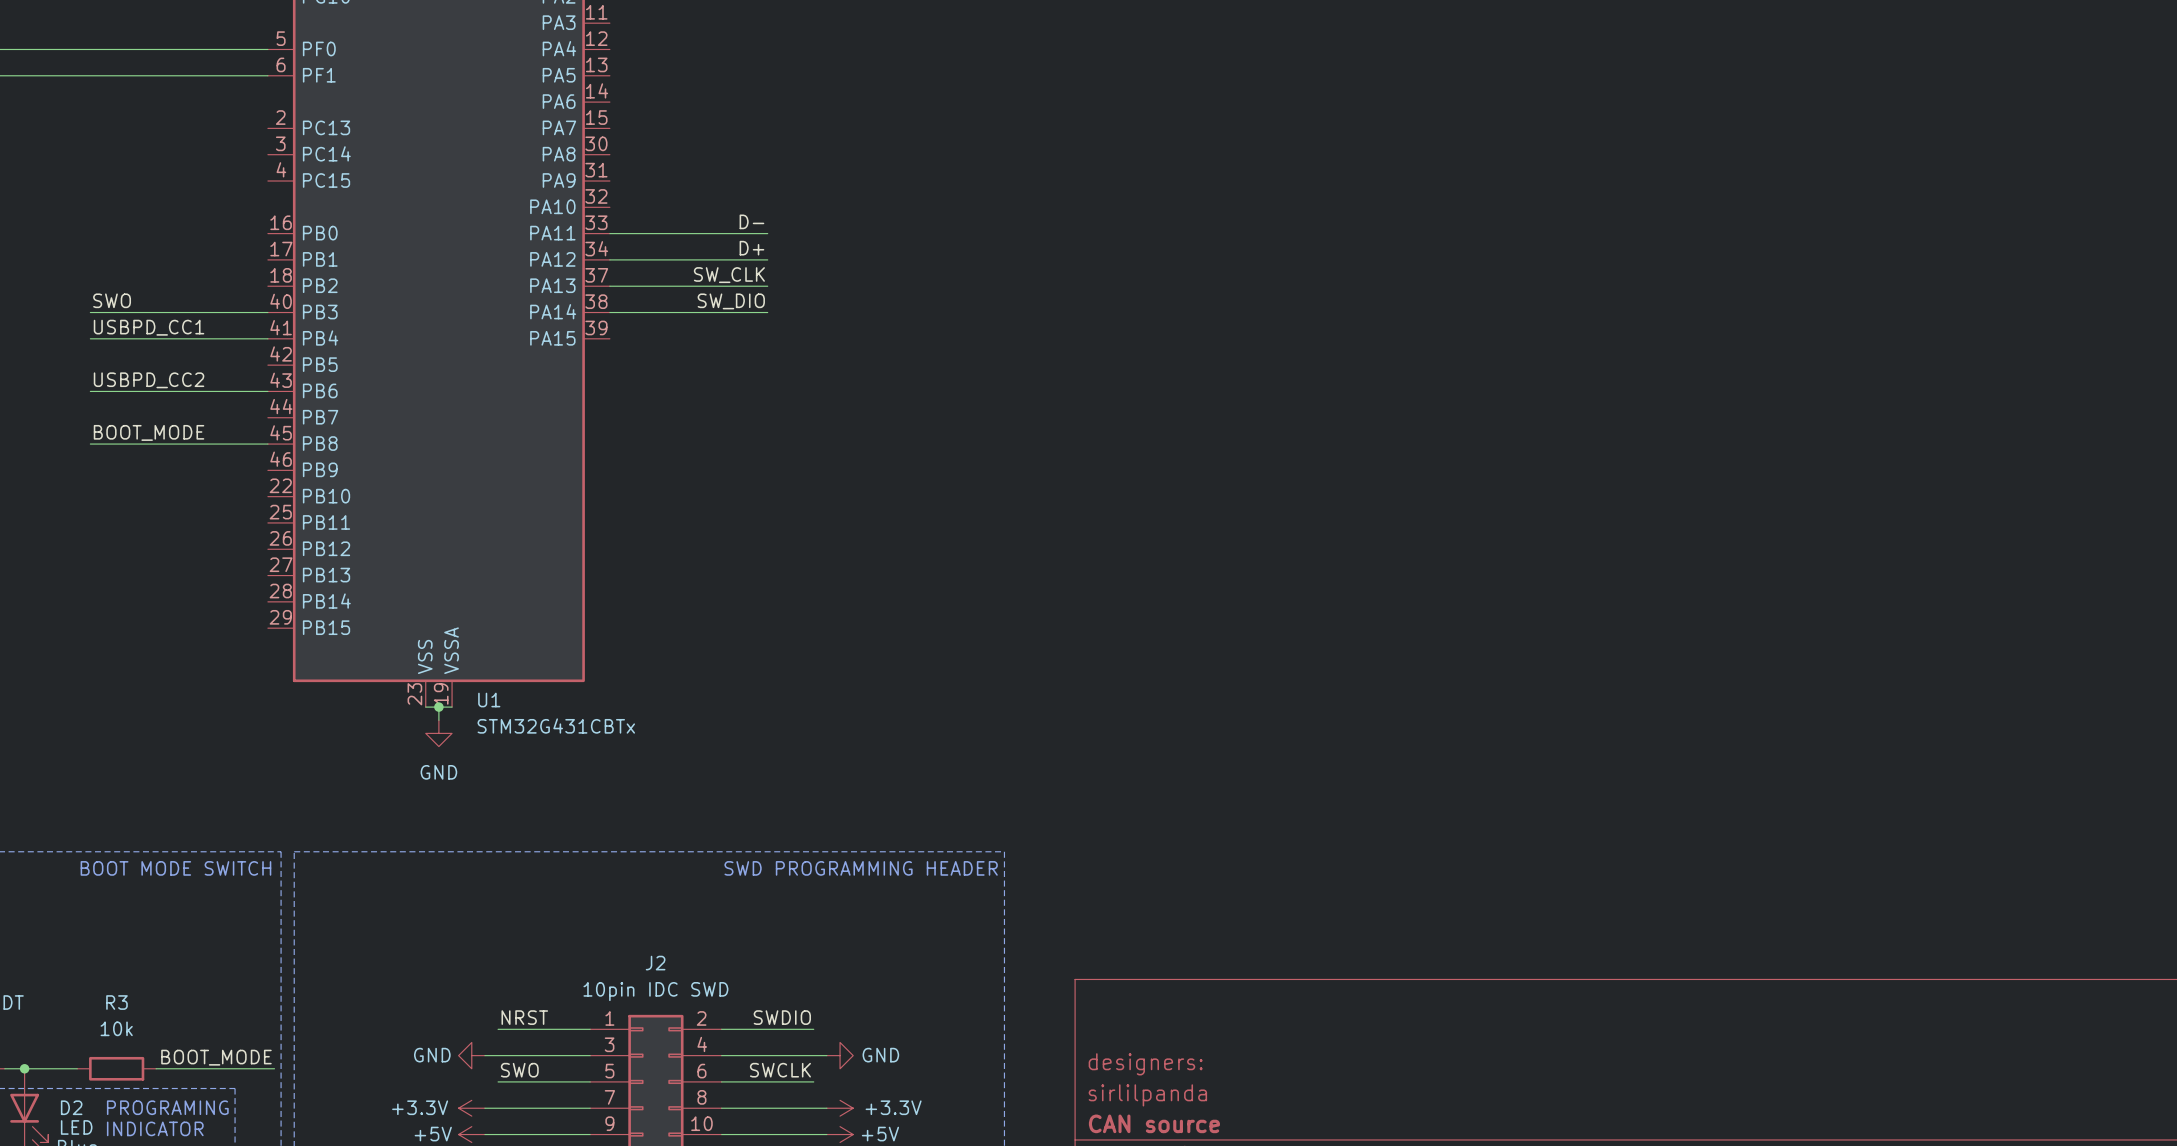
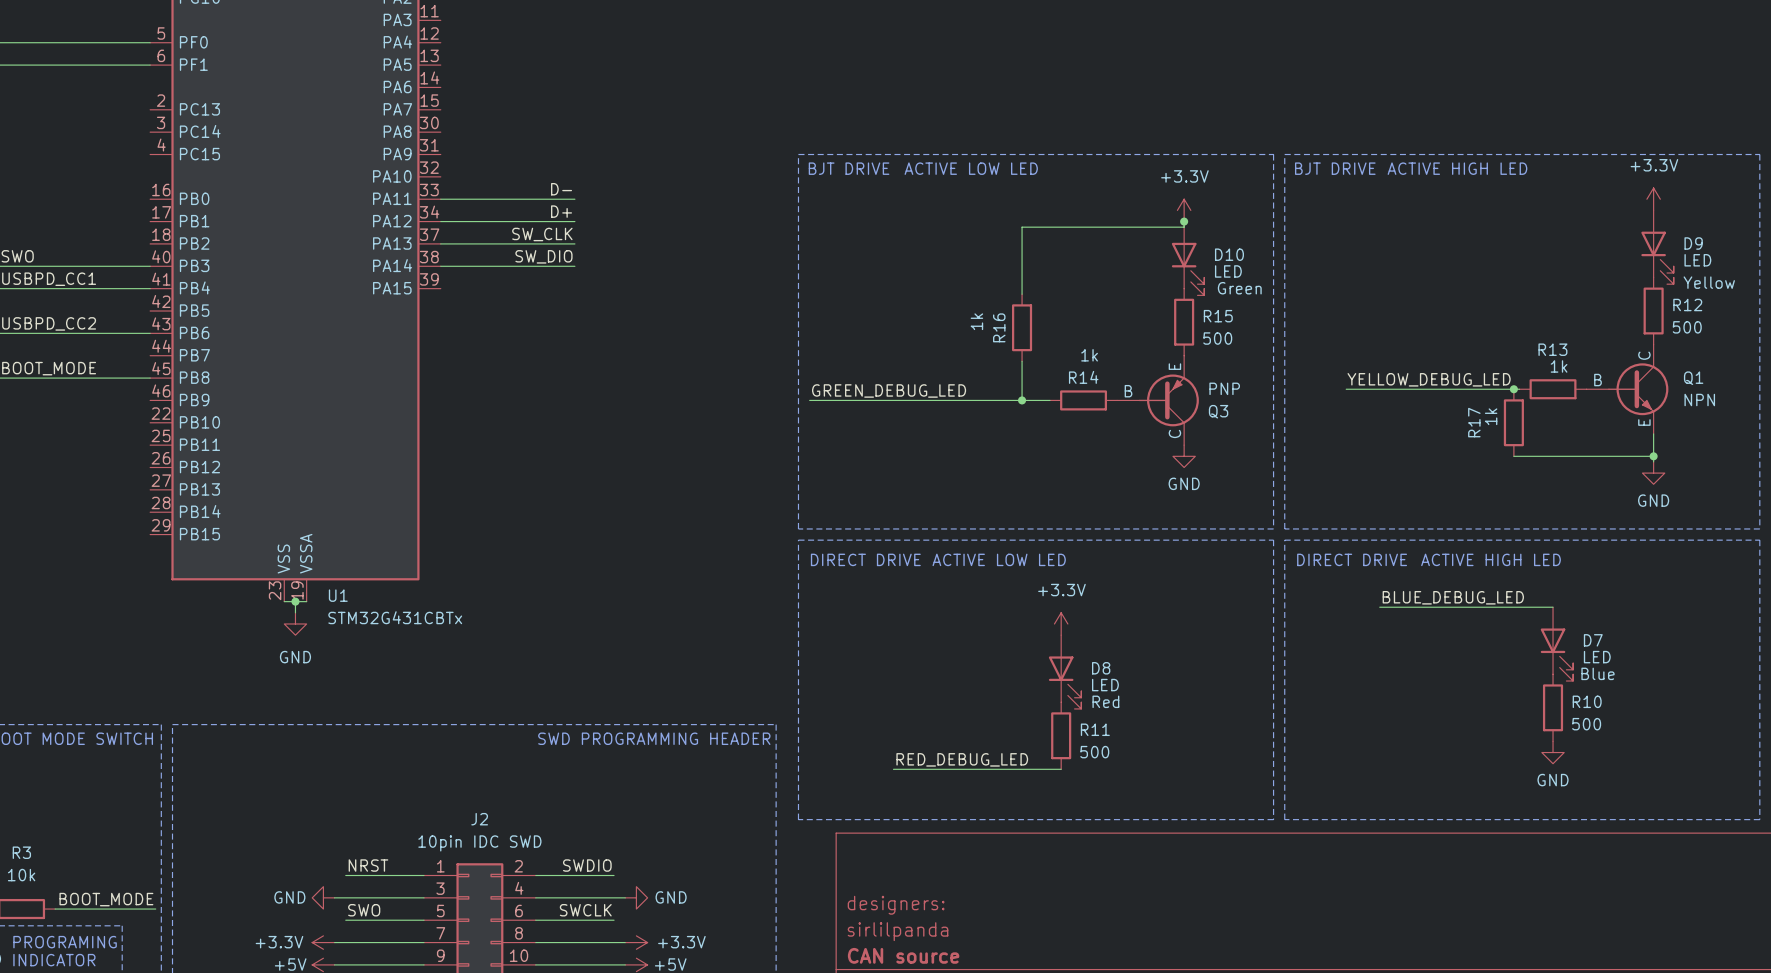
line: none -> (798, 154) (1273, 154) (1273, 528) (798, 528) (798, 154)
line: none -> (1284, 154) (1759, 154) (1759, 528) (1284, 528) (1284, 154)
text: none -> BJT DRIVE (849, 168)
text: none -> ACTIVE LOW LED (971, 168)
text: none -> BJT DRIVE (1335, 168)
text: none -> ACTIVE HIGH LED (1457, 168)
power symbol: none -> +3.3V (1653, 199)
power symbol: none -> +3.3V (1184, 210)
wire: none -> (1184, 221) (1184, 227) (1022, 227) (1022, 294)
junction: none -> (1184, 221)
D9: none -> LED (1657, 247)
D10: none -> LED (1188, 258)
R12: none -> 500 (1653, 311)
R15: none -> 500 (1184, 322)
R16: none -> 1k (1022, 327)
wire: none -> (1022, 361) (1022, 400)
label: none -> YELLOW_DEBUG_LED (1429, 379)
wire: none -> (1346, 389) (1519, 389)
junction: none -> (1513, 389)
R13: none -> 1k (1553, 389)
Q1: none -> NPN (1627, 389)
label: none -> GREEN_DEBUG_LED (889, 390)
wire: none -> (809, 400) (1049, 400)
junction: none -> (1022, 400)
R14: none -> 1k (1083, 400)
Q3: none -> PNP (1157, 400)
R17: none -> 1k (1513, 422)
wire: none -> (1653, 433) (1653, 461)
power symbol: none -> GND (1184, 456)
wire: none -> (1513, 456) (1653, 456)
junction: none -> (1653, 456)
power symbol: none -> GND (1653, 473)
line: none -> (798, 540) (798, 819) (1273, 819) (1273, 540) (798, 540)
line: none -> (1284, 540) (1284, 819) (1759, 819) (1759, 540) (1284, 540)
text: none -> DIRECT DRIVE (865, 559)
text: none -> ACTIVE LOW LED (999, 559)
text: none -> DIRECT DRIVE (1352, 559)
text: none -> ACTIVE HIGH LED (1491, 559)
label: none -> BLUE_DEBUG_LED (1453, 597)
wire: none -> (1379, 607) (1553, 607)
power symbol: none -> +3.3V (1061, 623)
D7: none -> LED (1556, 644)
D8: none -> LED (1065, 672)
R10: none -> 500 (1553, 707)
R11: none -> 500 (1061, 735)
power symbol: none -> GND (1553, 752)
label: none -> RED_DEBUG_LED (962, 759)
wire: none -> (893, 769) (1061, 769)

